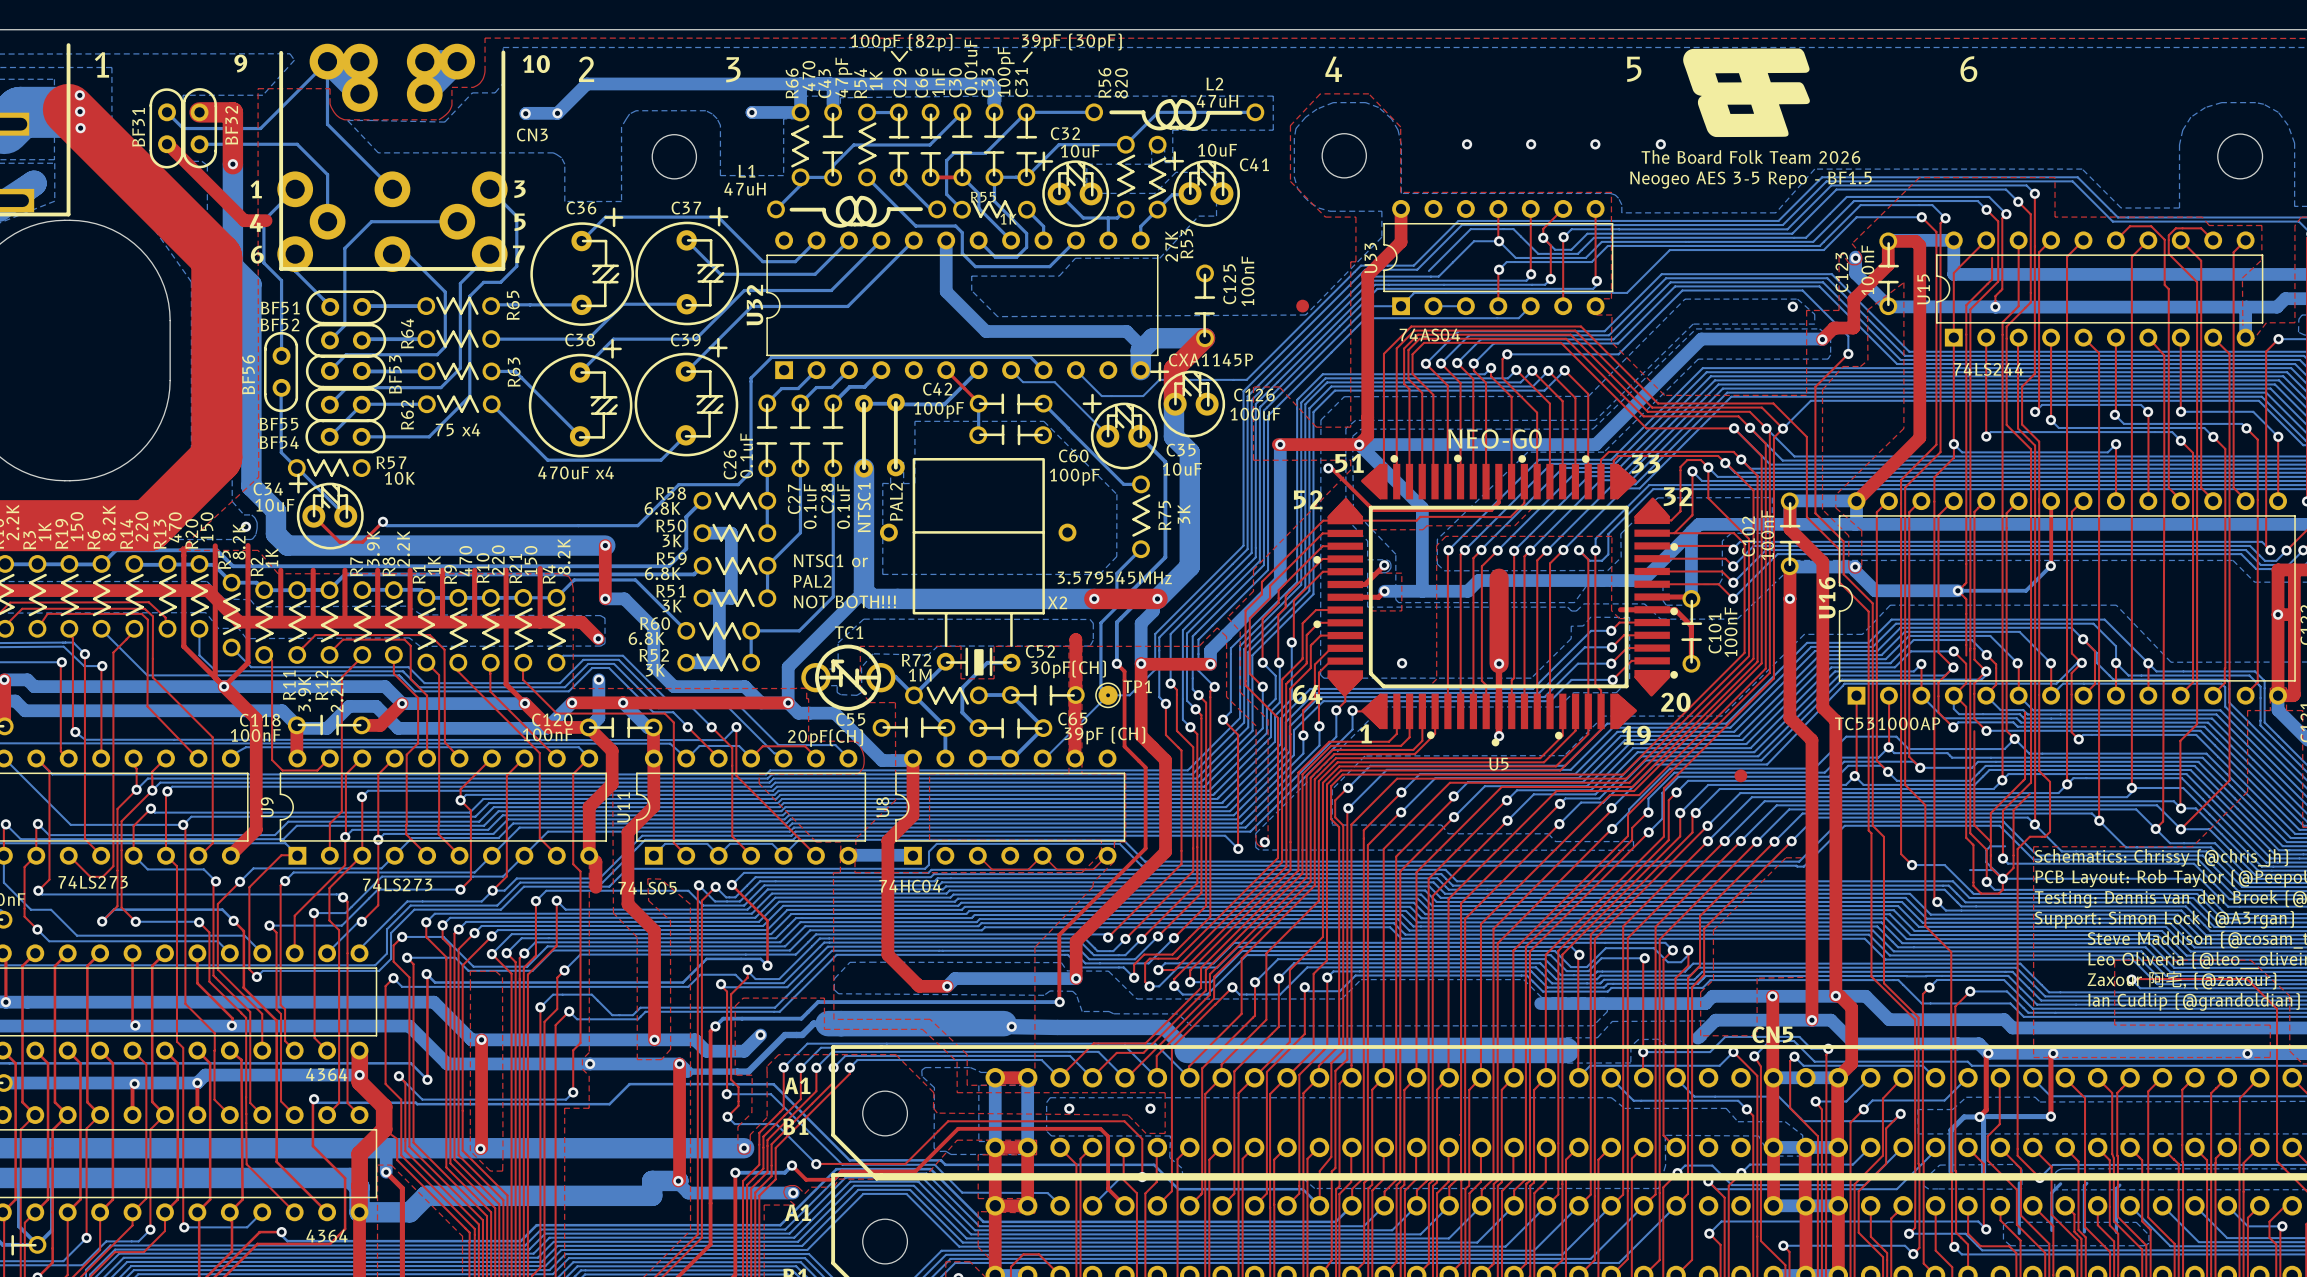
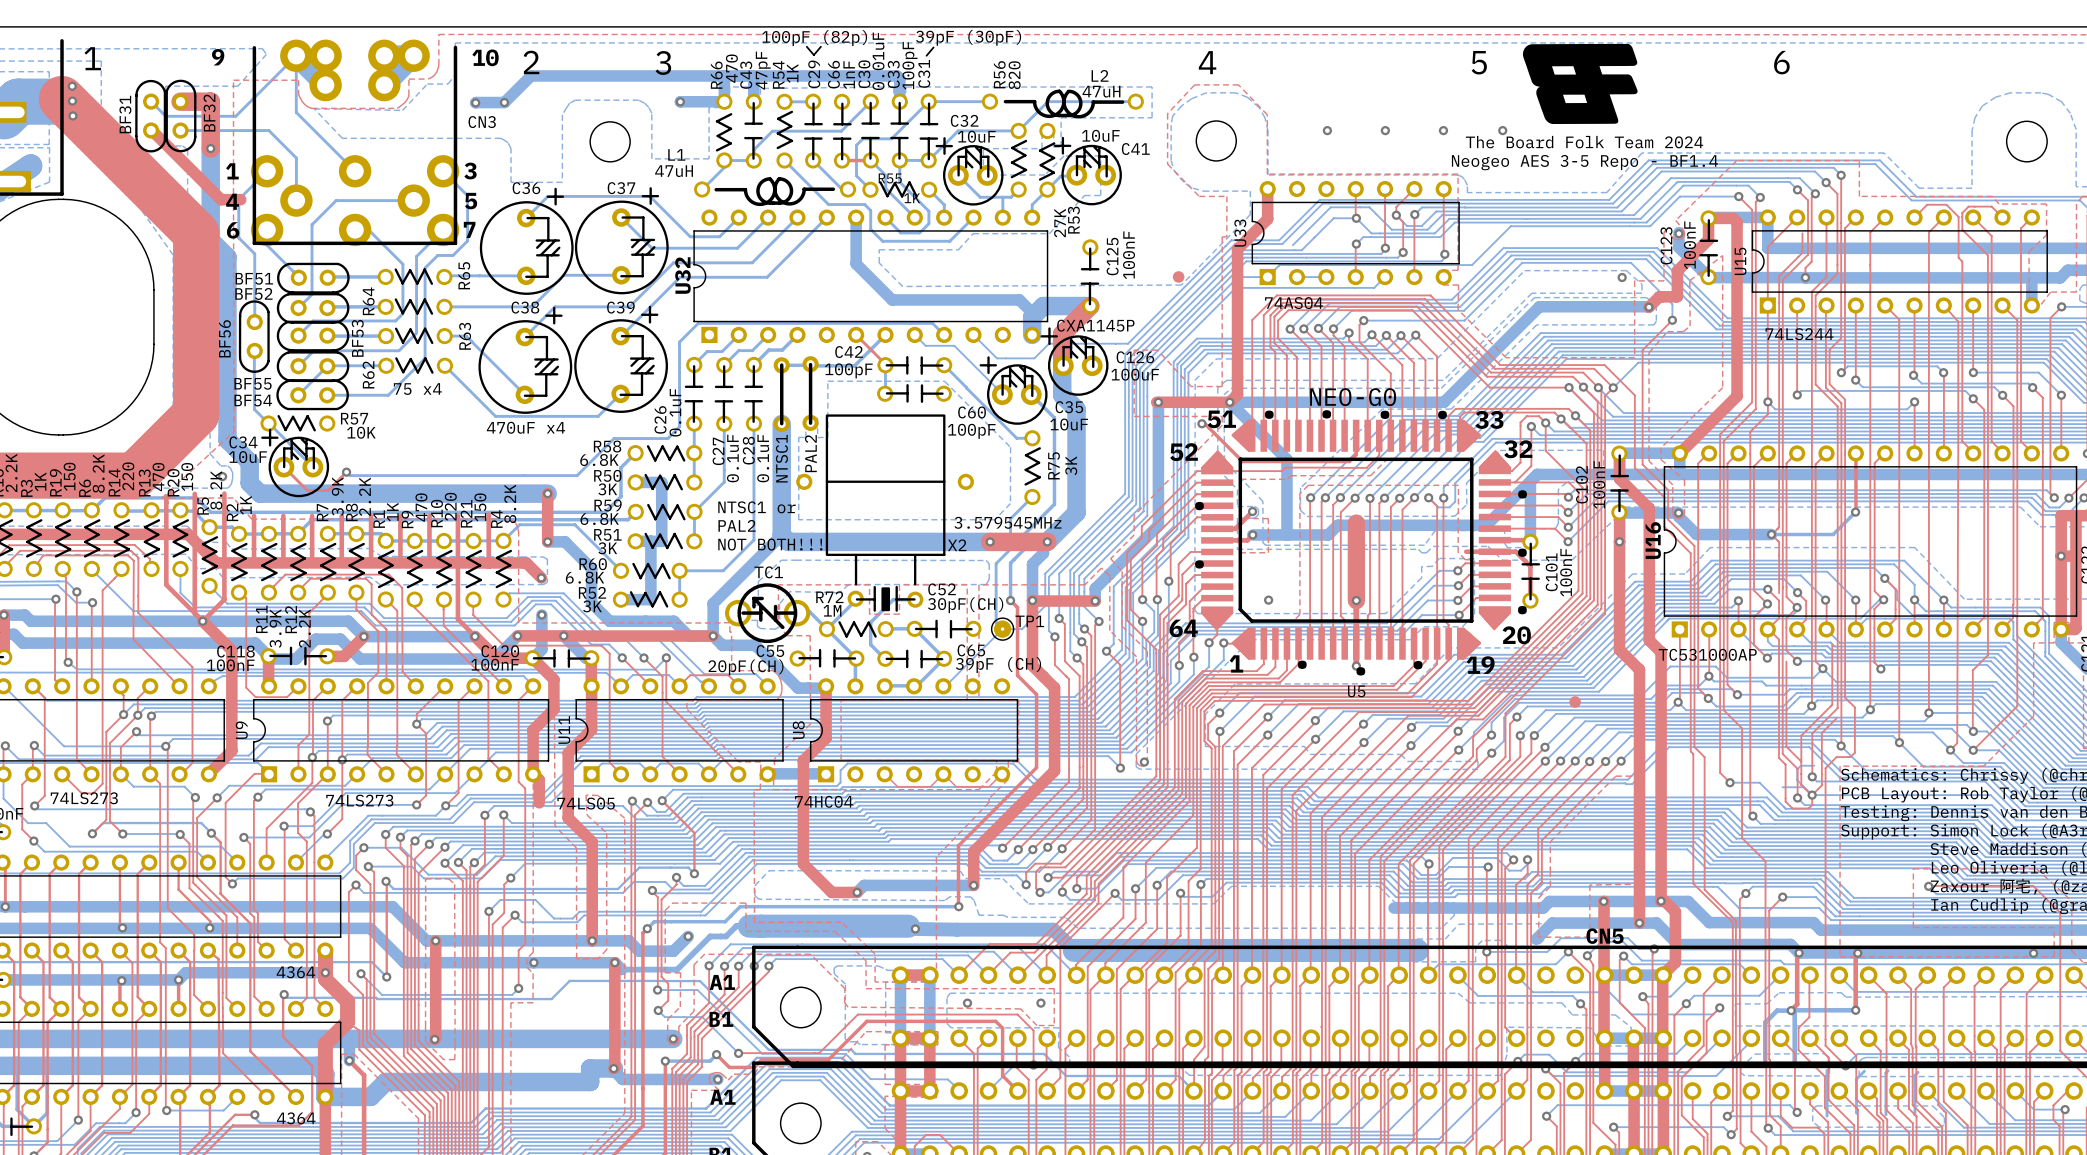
text: The Board Folk Team 2026 (1750, 156) -> The Board Folk Team 2024 (1584, 142)
text: Neogeo AES 3-5 Repo - BF1.5 (1751, 180) -> Neogeo AES 3-5 Repo - BF1.4 (1584, 162)
top track: (1075, 639) (1075, 695) -> none
top track: (1075, 695) (1075, 758) -> none

